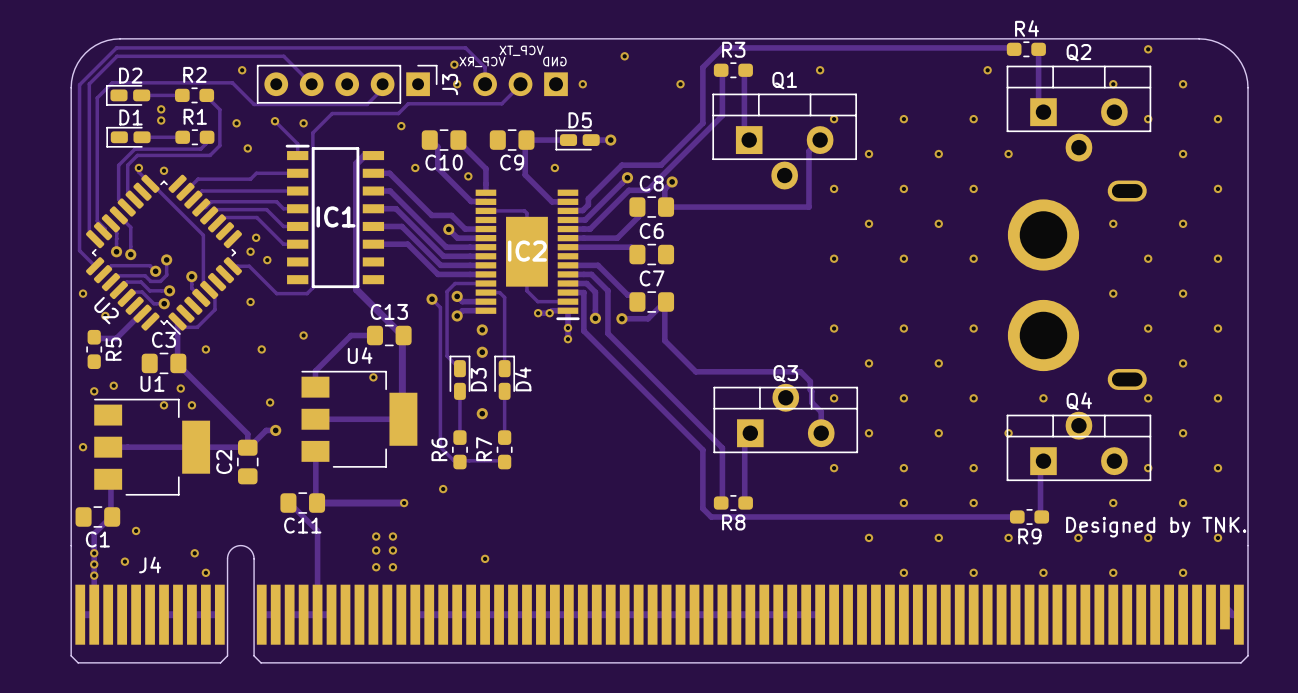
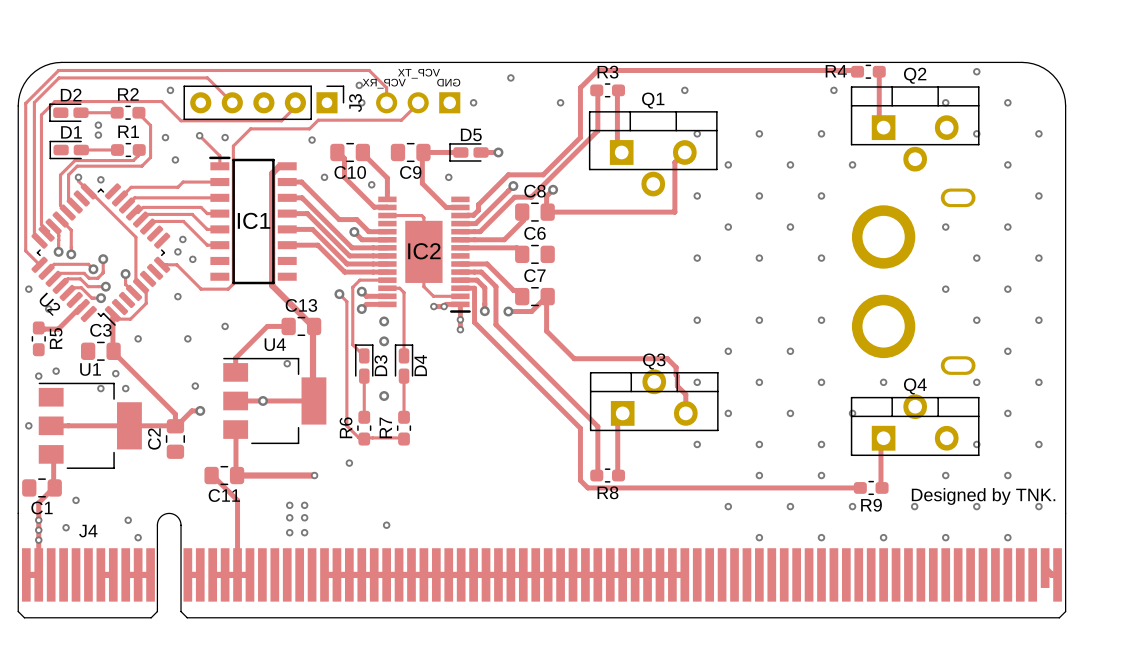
R4 name position: R4 (1027, 28) -> R4 (836, 71)
via: none -> (263, 400)

